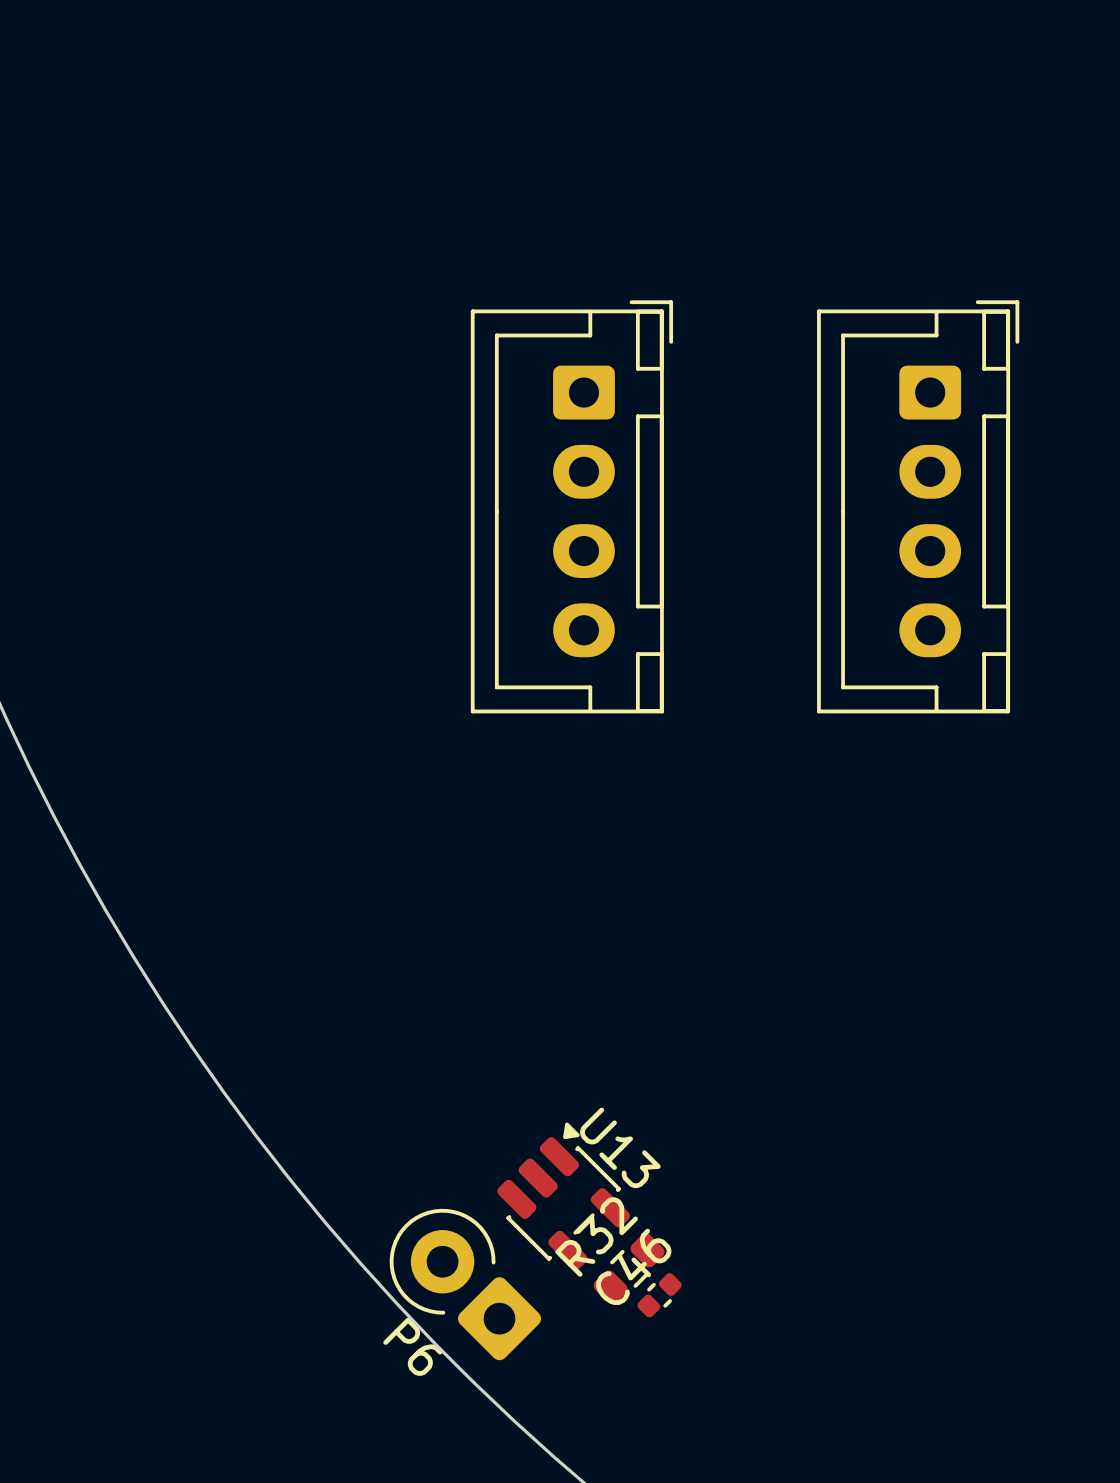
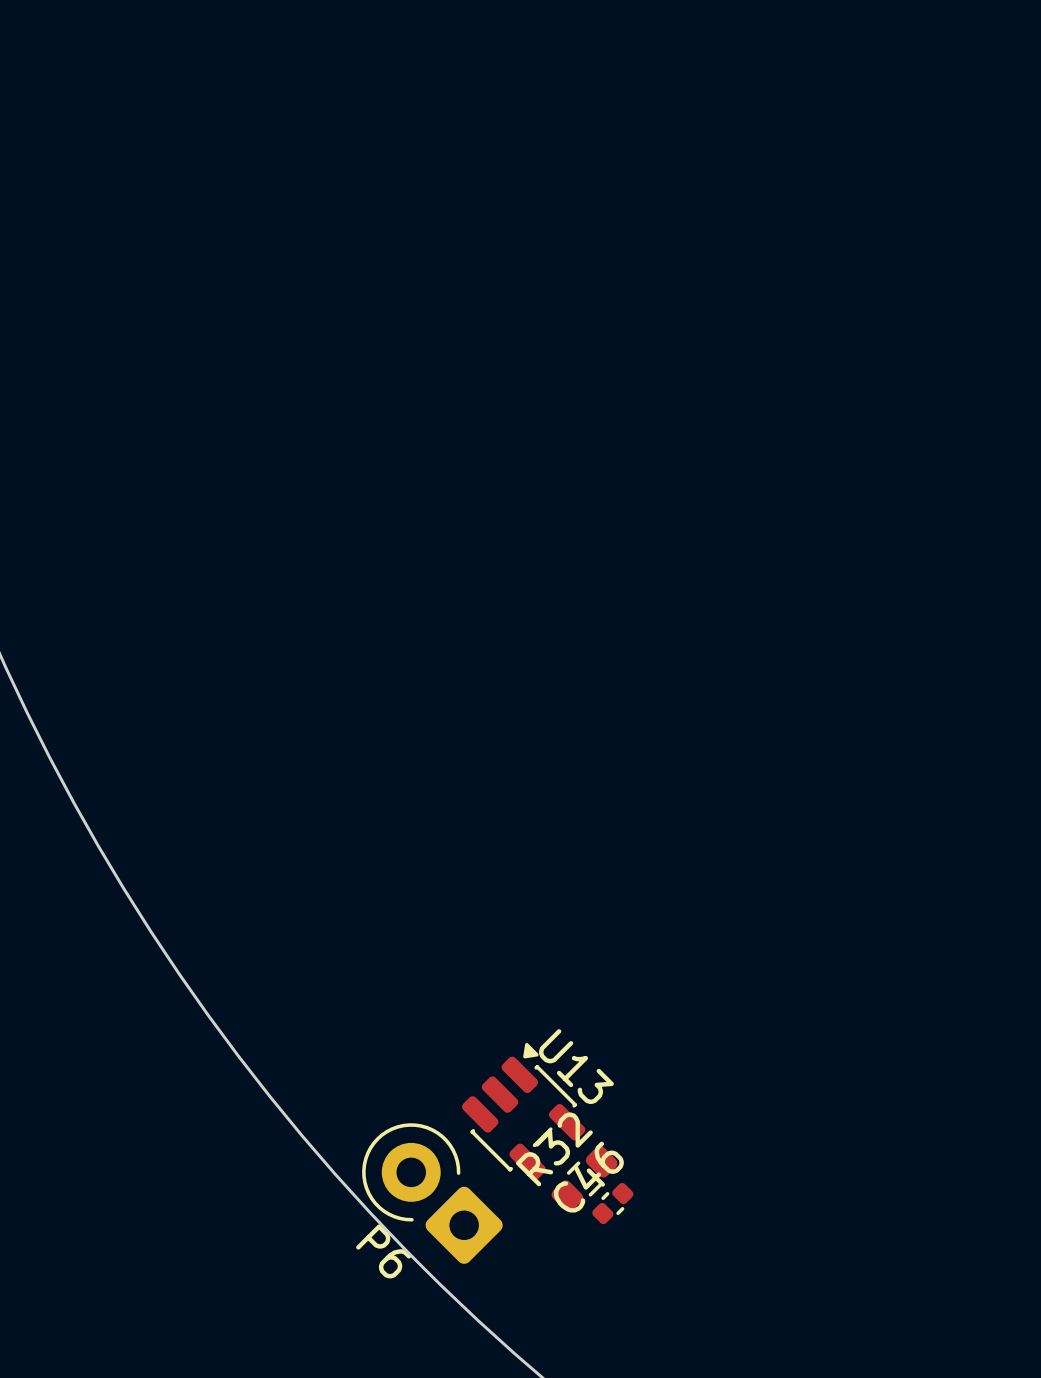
part: (571, 506) -> none
part: (918, 506) -> none

